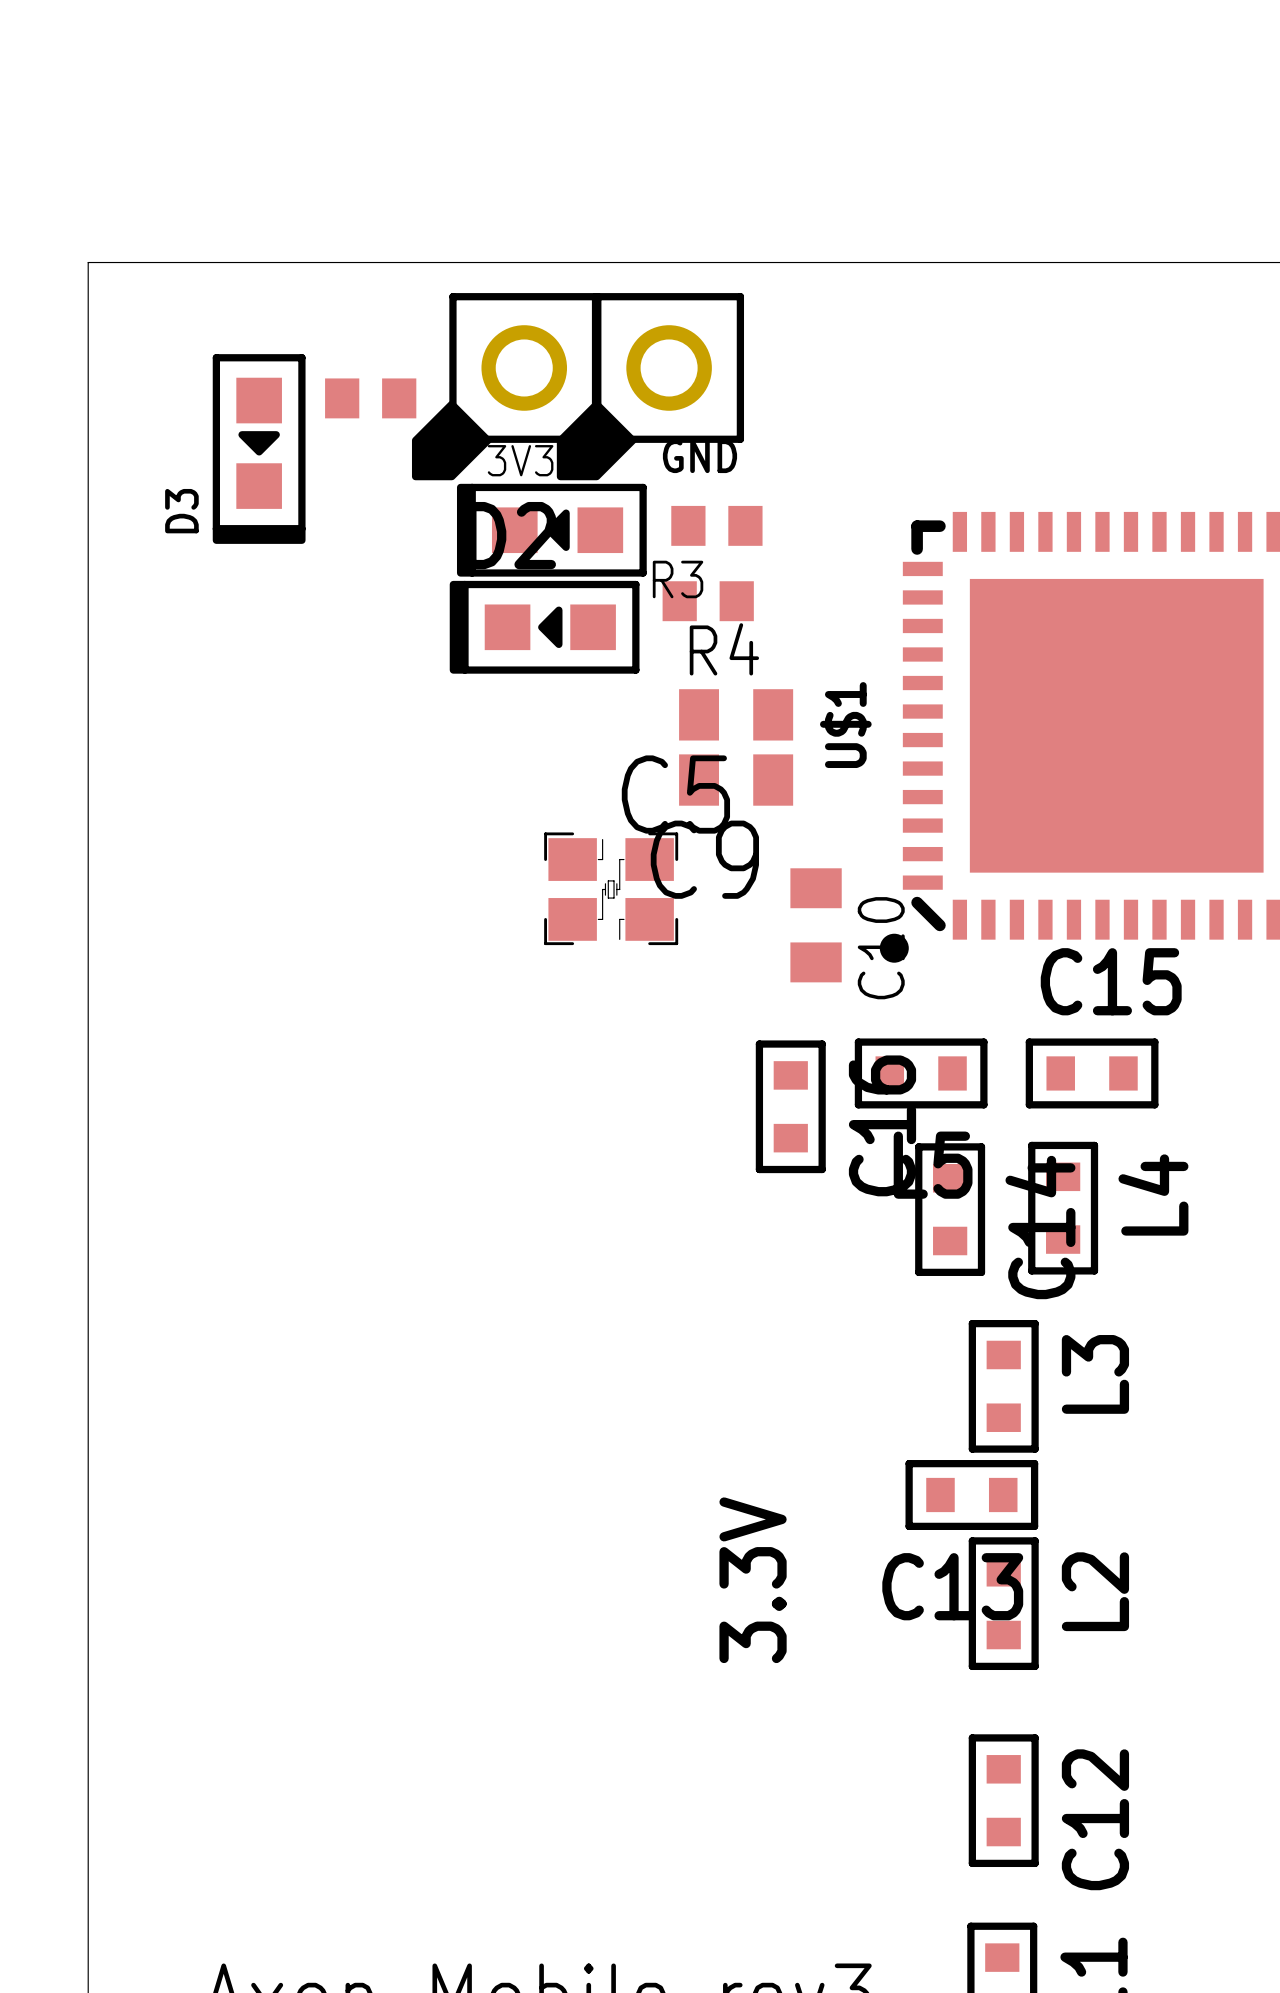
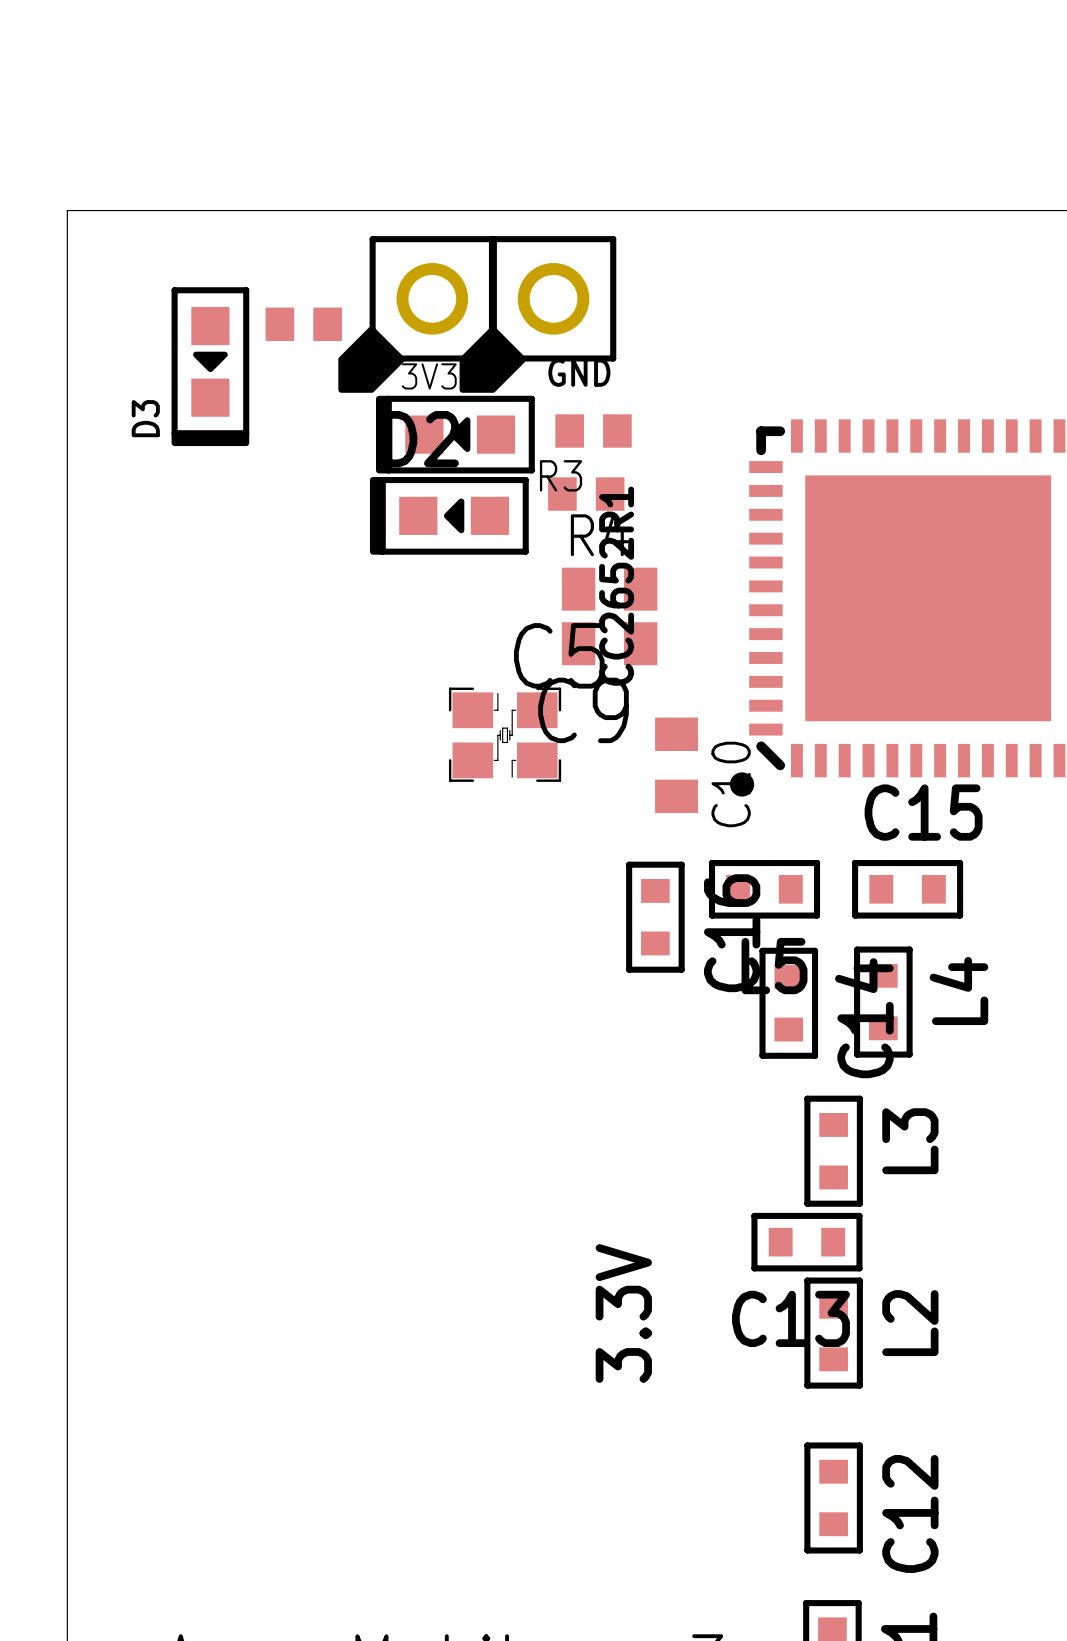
U$1 name: U$1 (845, 725) -> CC2652R1 (616, 586)

